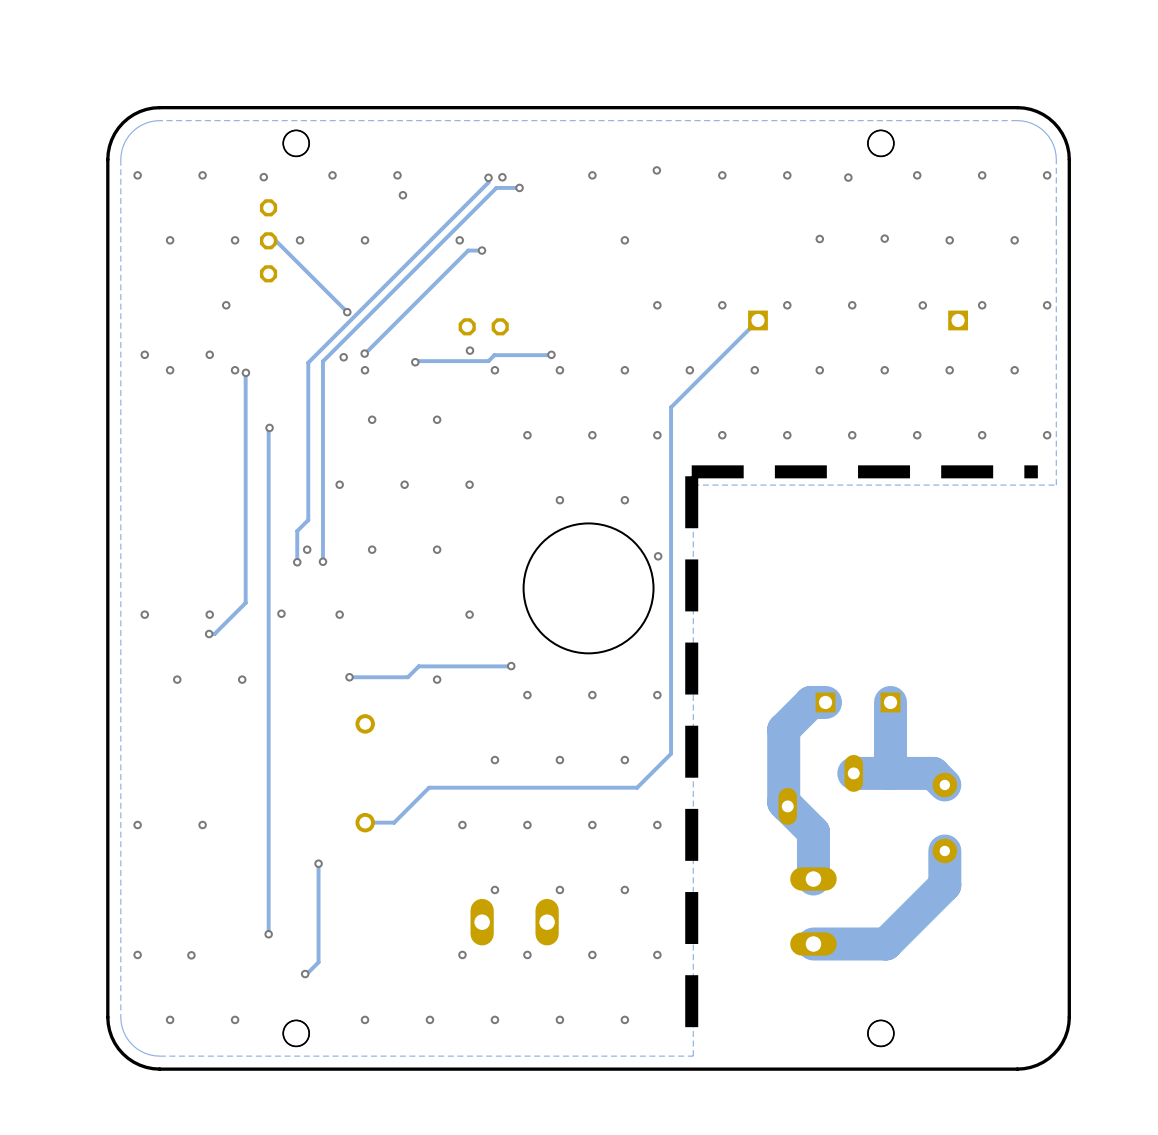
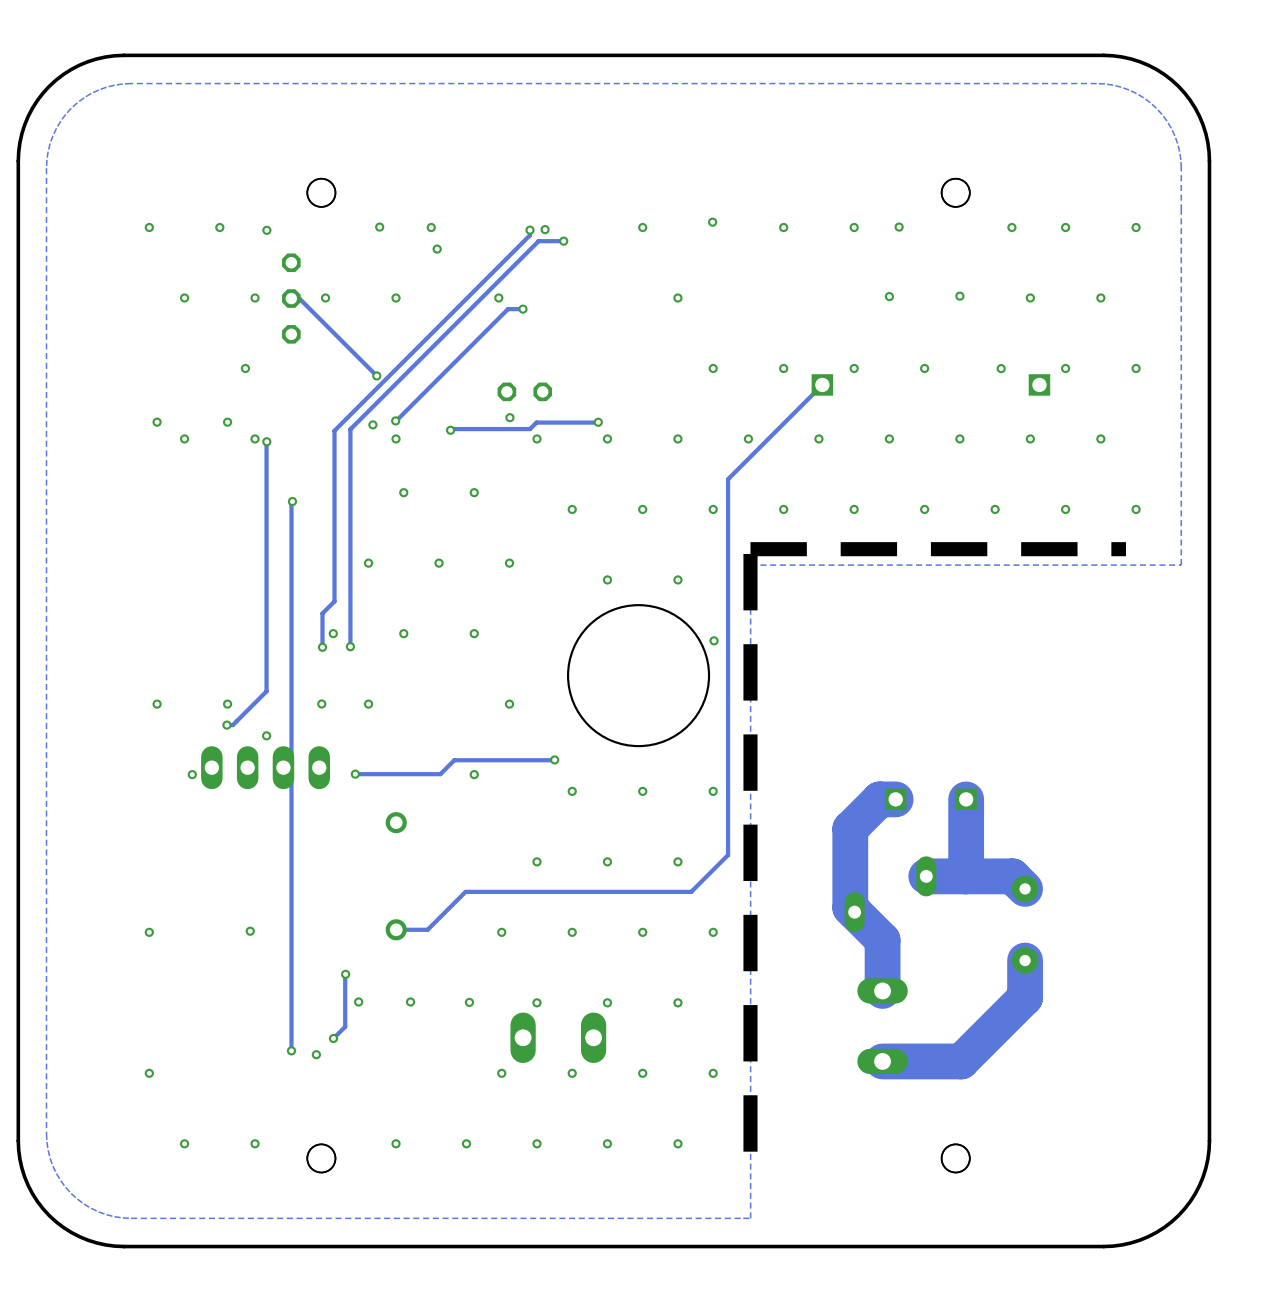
board edge: (1017, 107) (159, 107) (139, 111) (123, 122) (111, 139) (107, 159) (107, 1017) (111, 1037) (123, 1053) (139, 1065) (159, 1069) (1017, 1069) (1037, 1065) (1054, 1053) (1065, 1037) (1069, 1017) (1069, 159) (1065, 139) (1054, 122) (1037, 111) (1017, 107) -> (1103, 55) (1122, 56) (1139, 61) (1156, 69) (1178, 86) (1190, 100) (1199, 116) (1205, 133) (1209, 151) (1209, 1140) (1207, 1159) (1203, 1176) (1195, 1193) (1184, 1208) (1171, 1221) (1148, 1236) (1122, 1244) (1103, 1246) (124, 1246) (105, 1244) (87, 1240) (71, 1232) (56, 1221) (43, 1208) (28, 1185) (19, 1159) (18, 1140) (18, 161) (19, 142) (24, 124) (32, 108) (43, 93) (56, 80) (79, 65) (105, 56) (124, 55) (1103, 55)
zone outline: (1017, 120) (1027, 121) (1041, 128) (1051, 140) (1055, 154) (1056, 485) (693, 485) (693, 1056) (159, 1056) (144, 1053) (132, 1044) (123, 1032) (120, 1017) (120, 159) (123, 144) (132, 132) (144, 123) (159, 120) (1017, 120) -> (1096, 83) (1113, 85) (1129, 90) (1150, 102) (1162, 114) (1171, 128) (1179, 151) (1181, 168) (1181, 565) (750, 565) (750, 1218) (131, 1218) (114, 1216) (98, 1211) (84, 1204) (71, 1193) (60, 1180) (52, 1166) (48, 1150) (46, 1133) (46, 168) (48, 151) (52, 135) (60, 121) (71, 108) (84, 97) (98, 90) (114, 85) (131, 83) (1096, 83)
via position: (332, 175) -> (379, 227)
via position: (917, 175) -> (1011, 227)
via position: (263, 177) -> (266, 230)
via position: (848, 177) -> (899, 227)
via position: (281, 613) -> (321, 703)
via: none -> (266, 735)
part: none -> (265, 767)
via position: (349, 677) -> (355, 774)
track: (407, 677) (349, 677) -> (442, 772) (440, 774) (355, 774)
via: (242, 679) -> none
via position: (202, 825) -> (250, 931)
track: (318, 863) (318, 962) (305, 974) -> (345, 974) (345, 1026) (333, 1038)
via: none -> (358, 1001)
via: none -> (410, 1001)
via: none -> (469, 1002)
via: none -> (333, 1038)
via: none -> (316, 1054)
via: (191, 955) -> none
via: (305, 974) -> none

